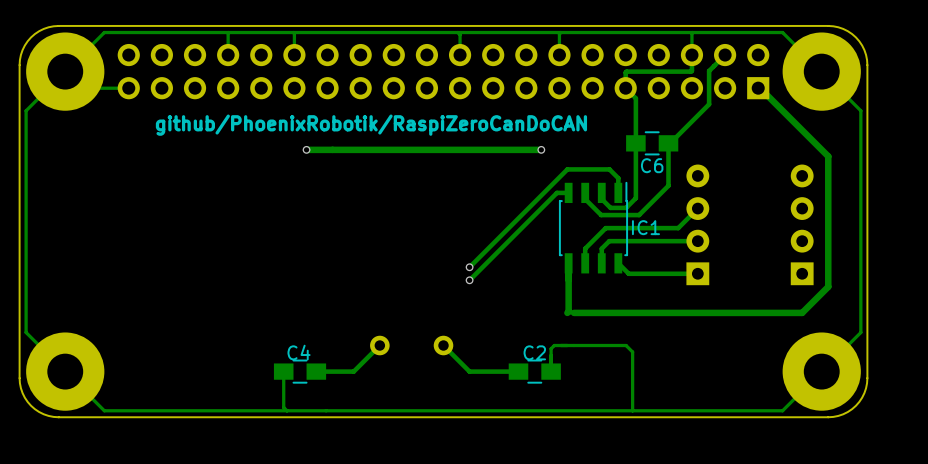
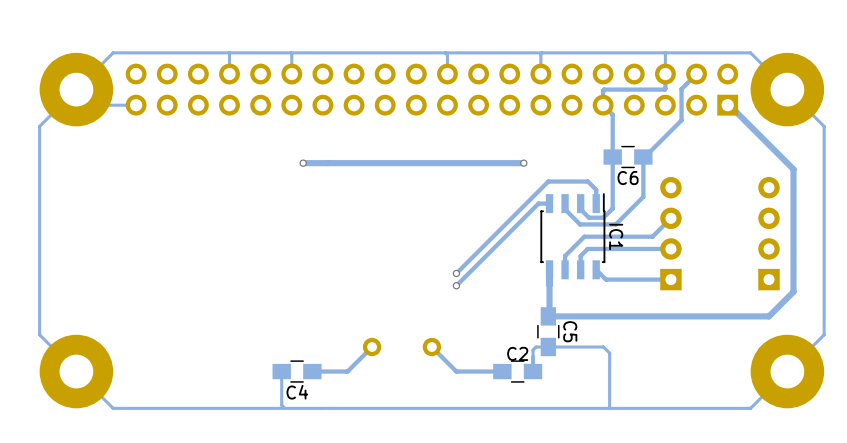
board edge: (828, 25) (58, 25) (43, 28) (27, 41) (22, 50) (19, 65) (19, 378) (22, 393) (34, 409) (43, 414) (58, 417) (828, 417) (843, 414) (859, 401) (867, 383) (867, 65) (864, 50) (855, 37) (843, 28) (828, 25) -> none
text: github/PhoenixRobotik/RaspiZeroCanDoCAN (371, 125) -> none
IC1 name rotation: 0° (645, 227) -> 90° clockwise (616, 236)
C5: none -> (548, 331)
C4 name position: C4 (299, 352) -> C4 (297, 392)

